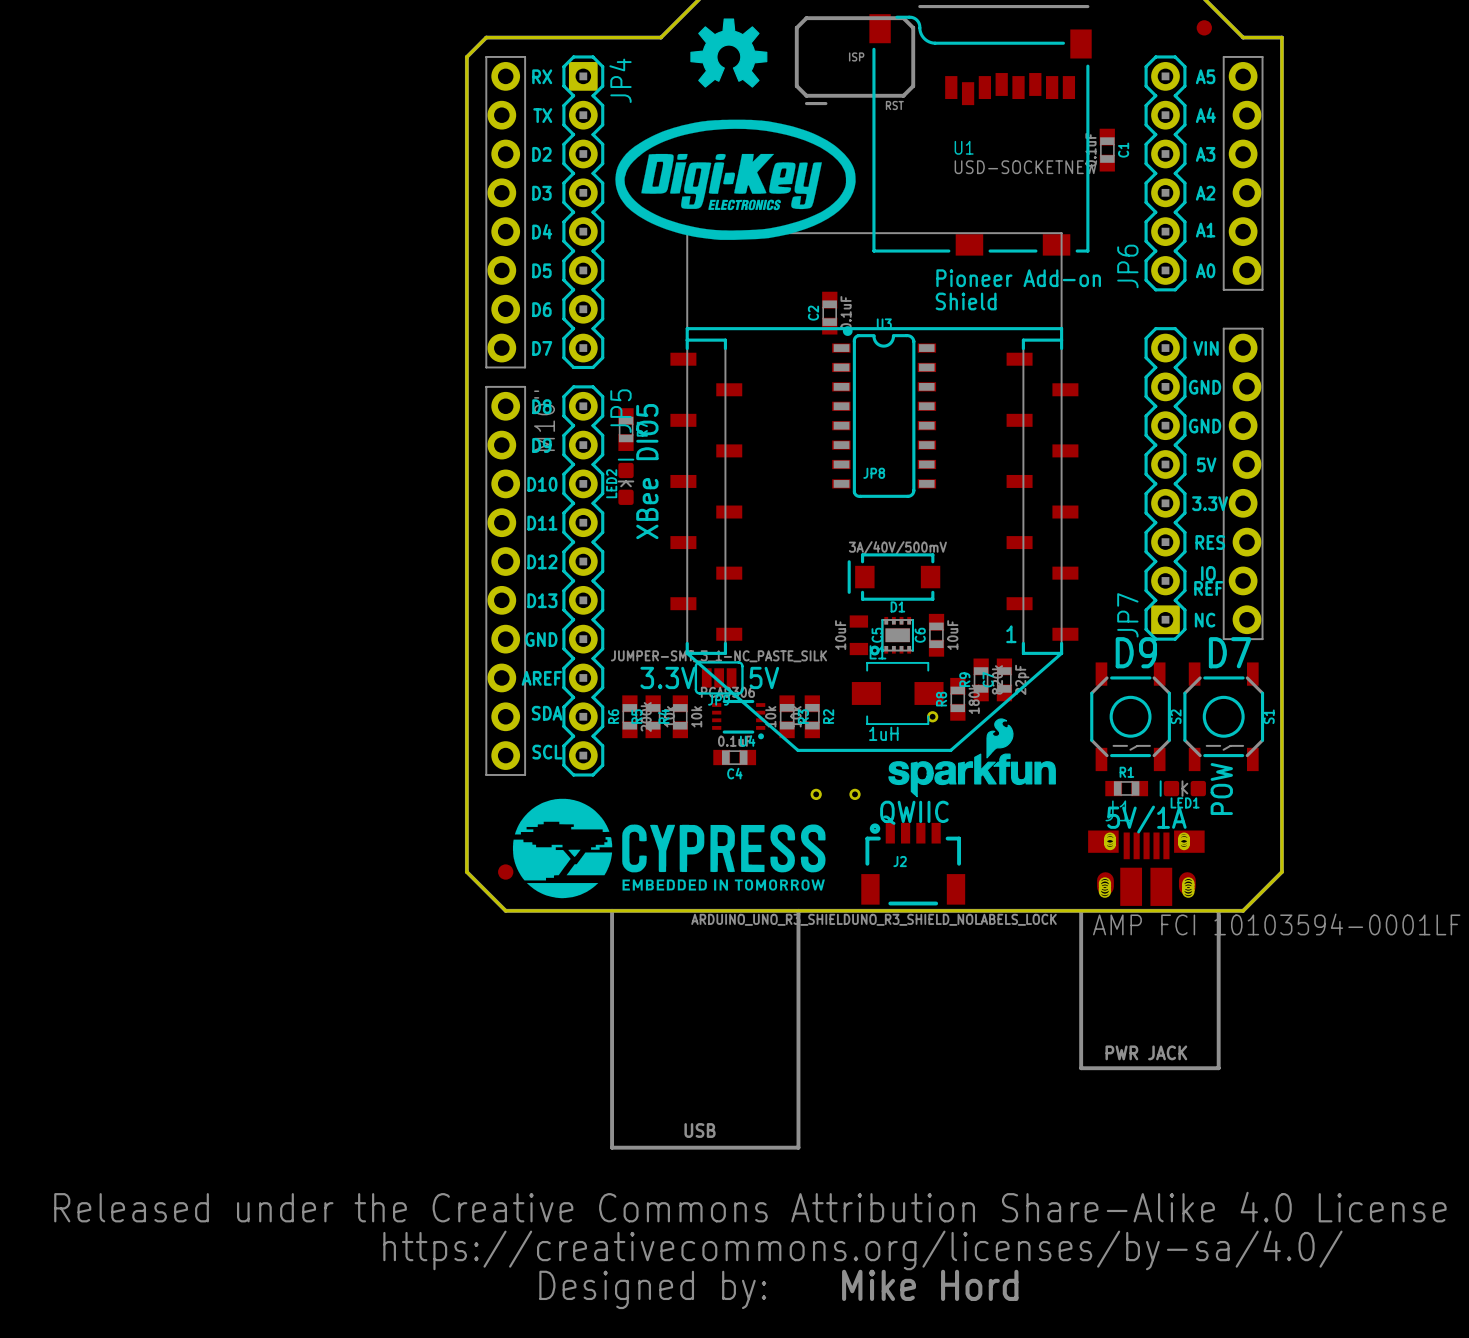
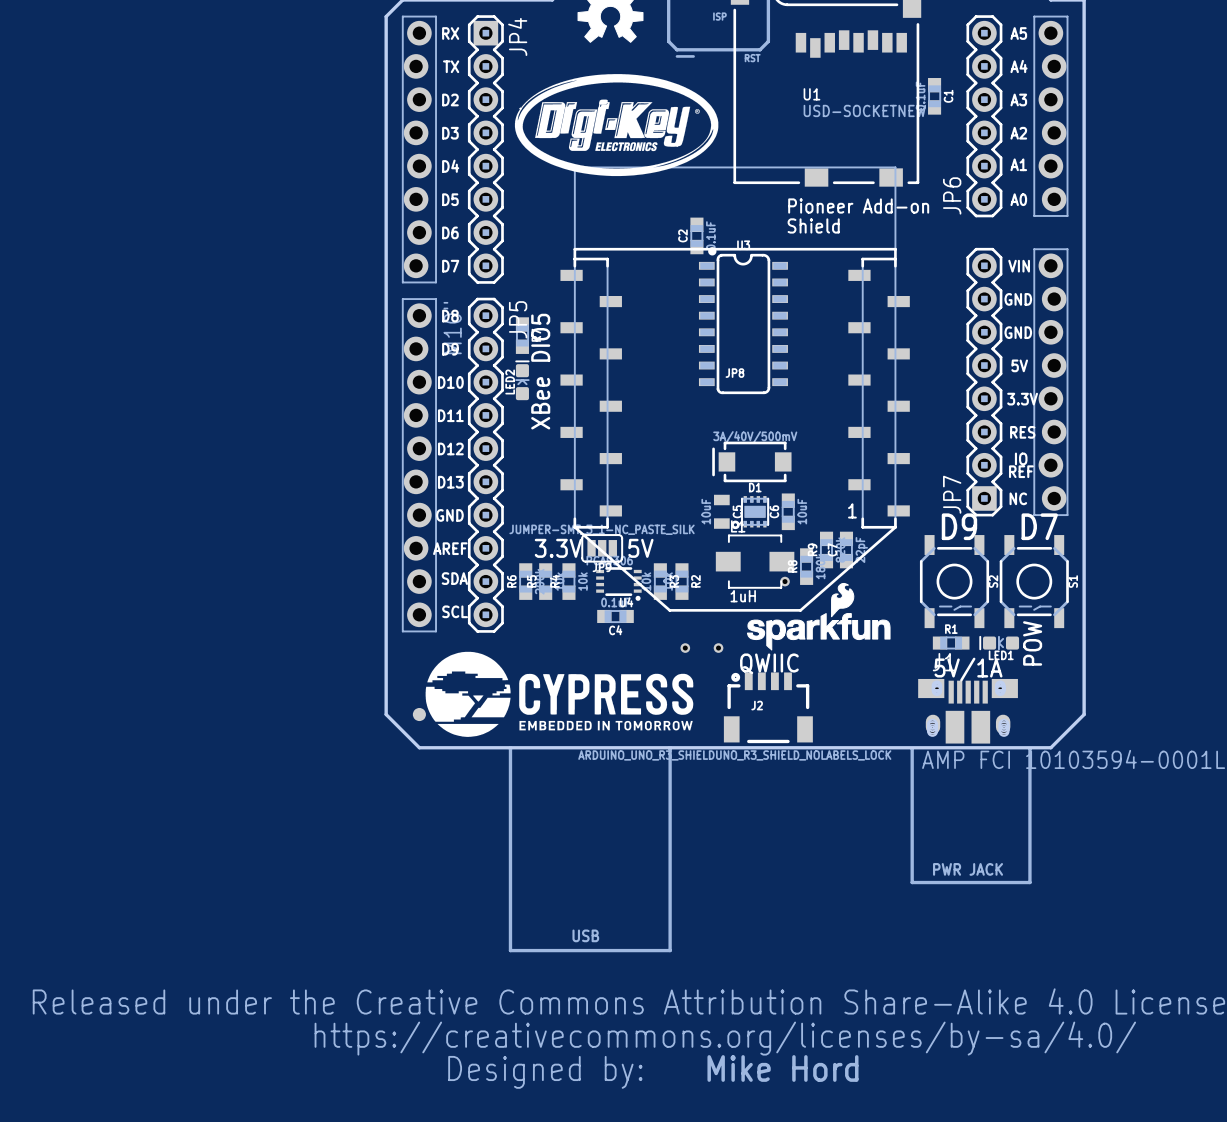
drawing: [615, 119, 856, 240] -> none
drawing: none -> [514, 74, 719, 177]
drawing shape: [615, 143, 640, 176] -> [517, 111, 520, 115]
drawing shape: [677, 153, 688, 160] -> [568, 102, 570, 104]
drawing shape: [734, 153, 775, 194] -> [614, 102, 653, 139]

